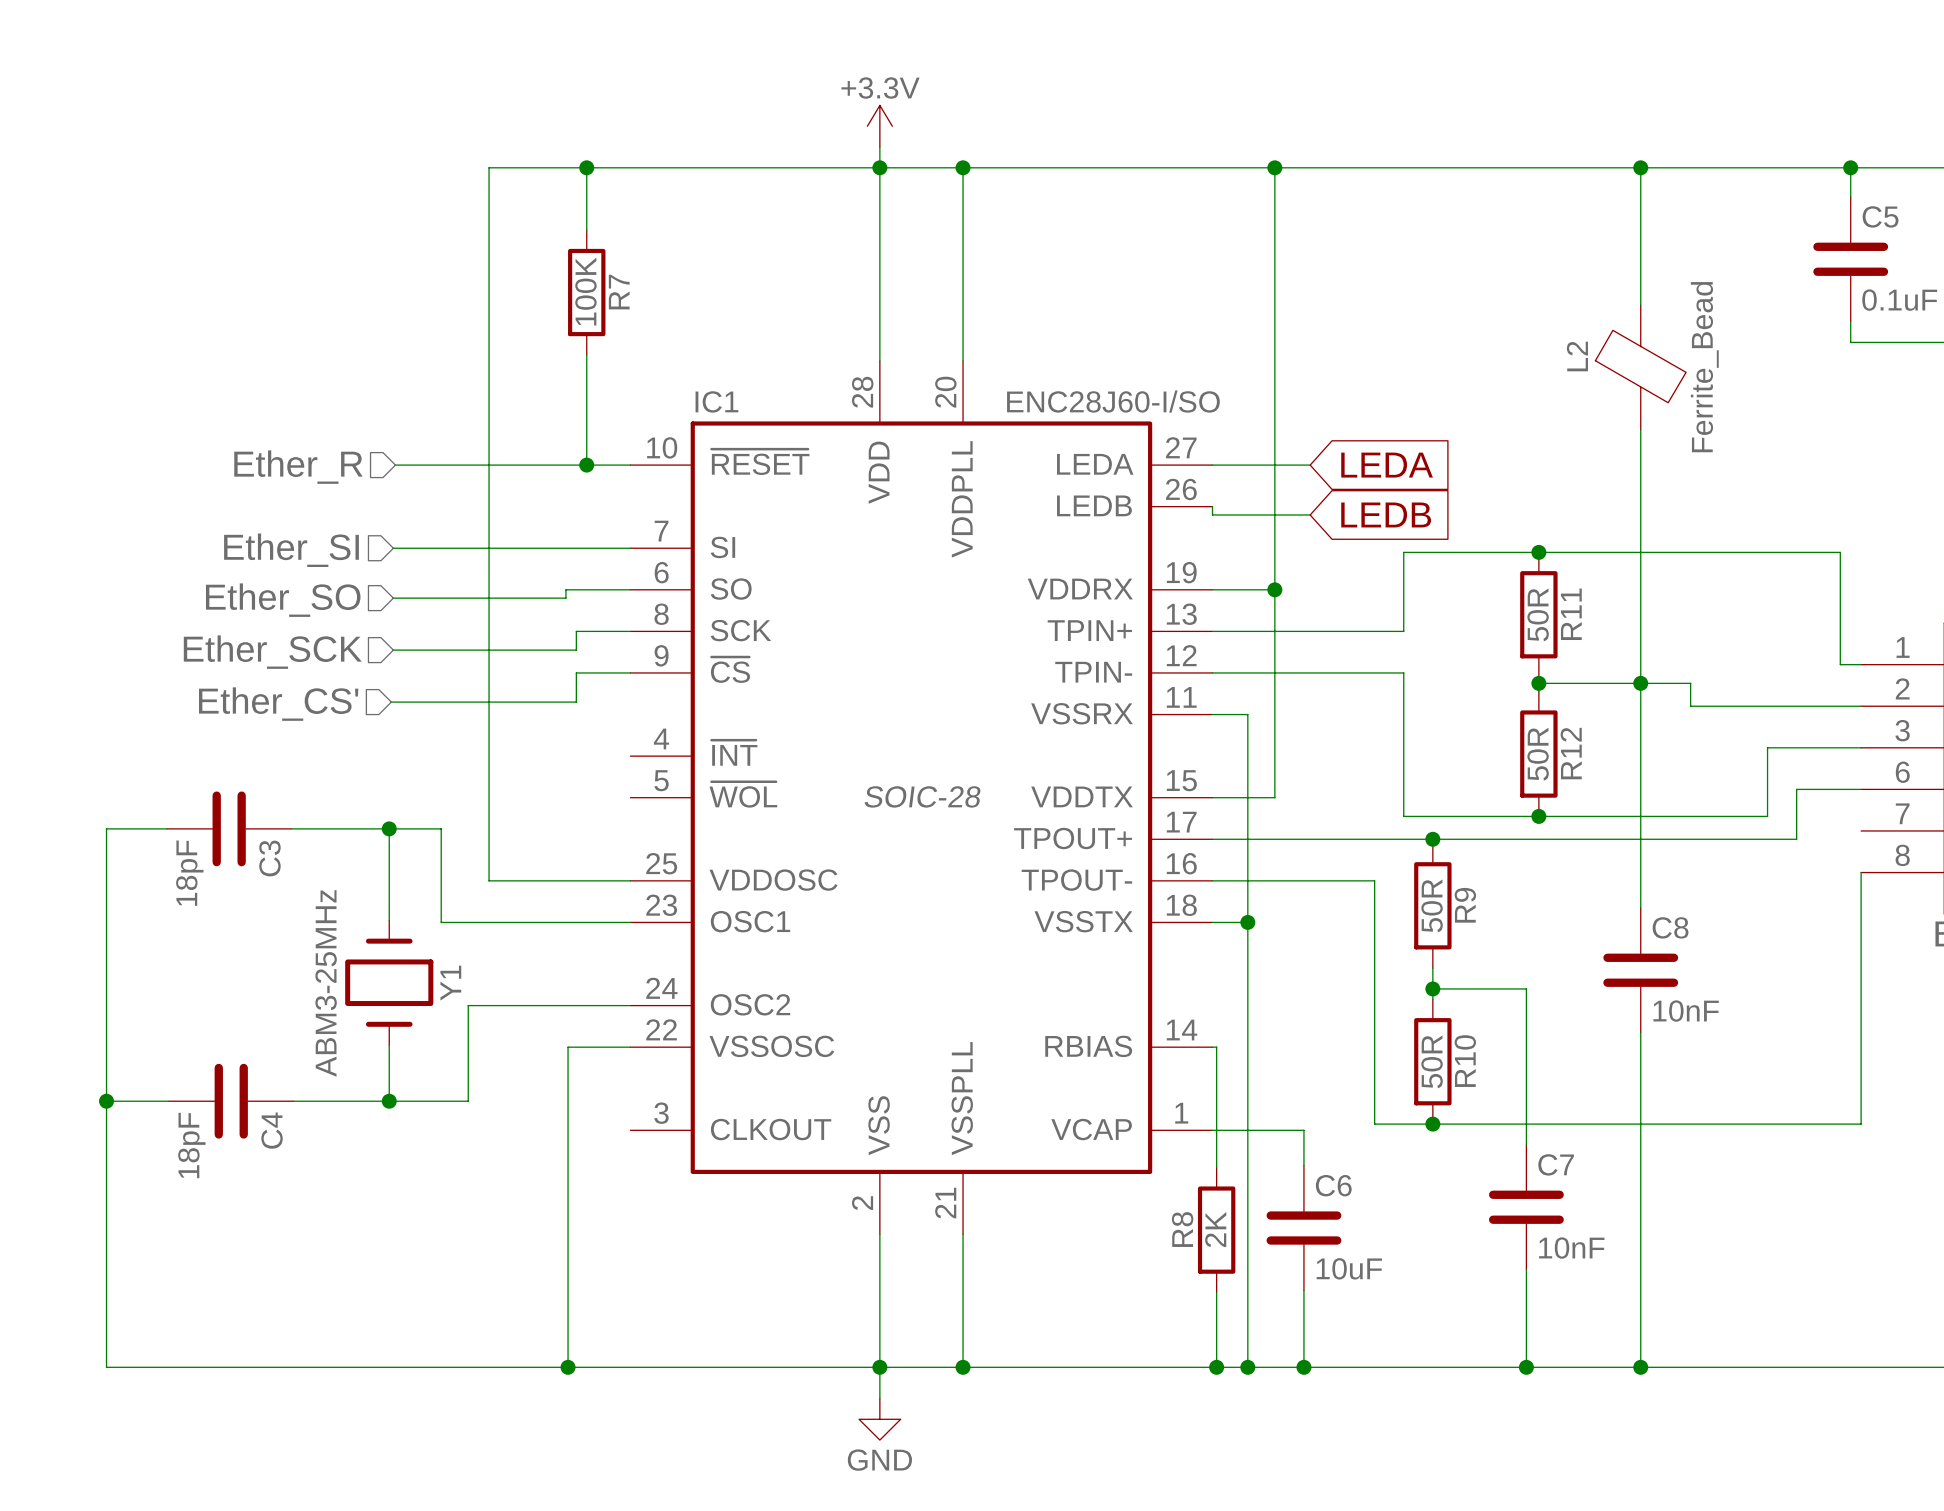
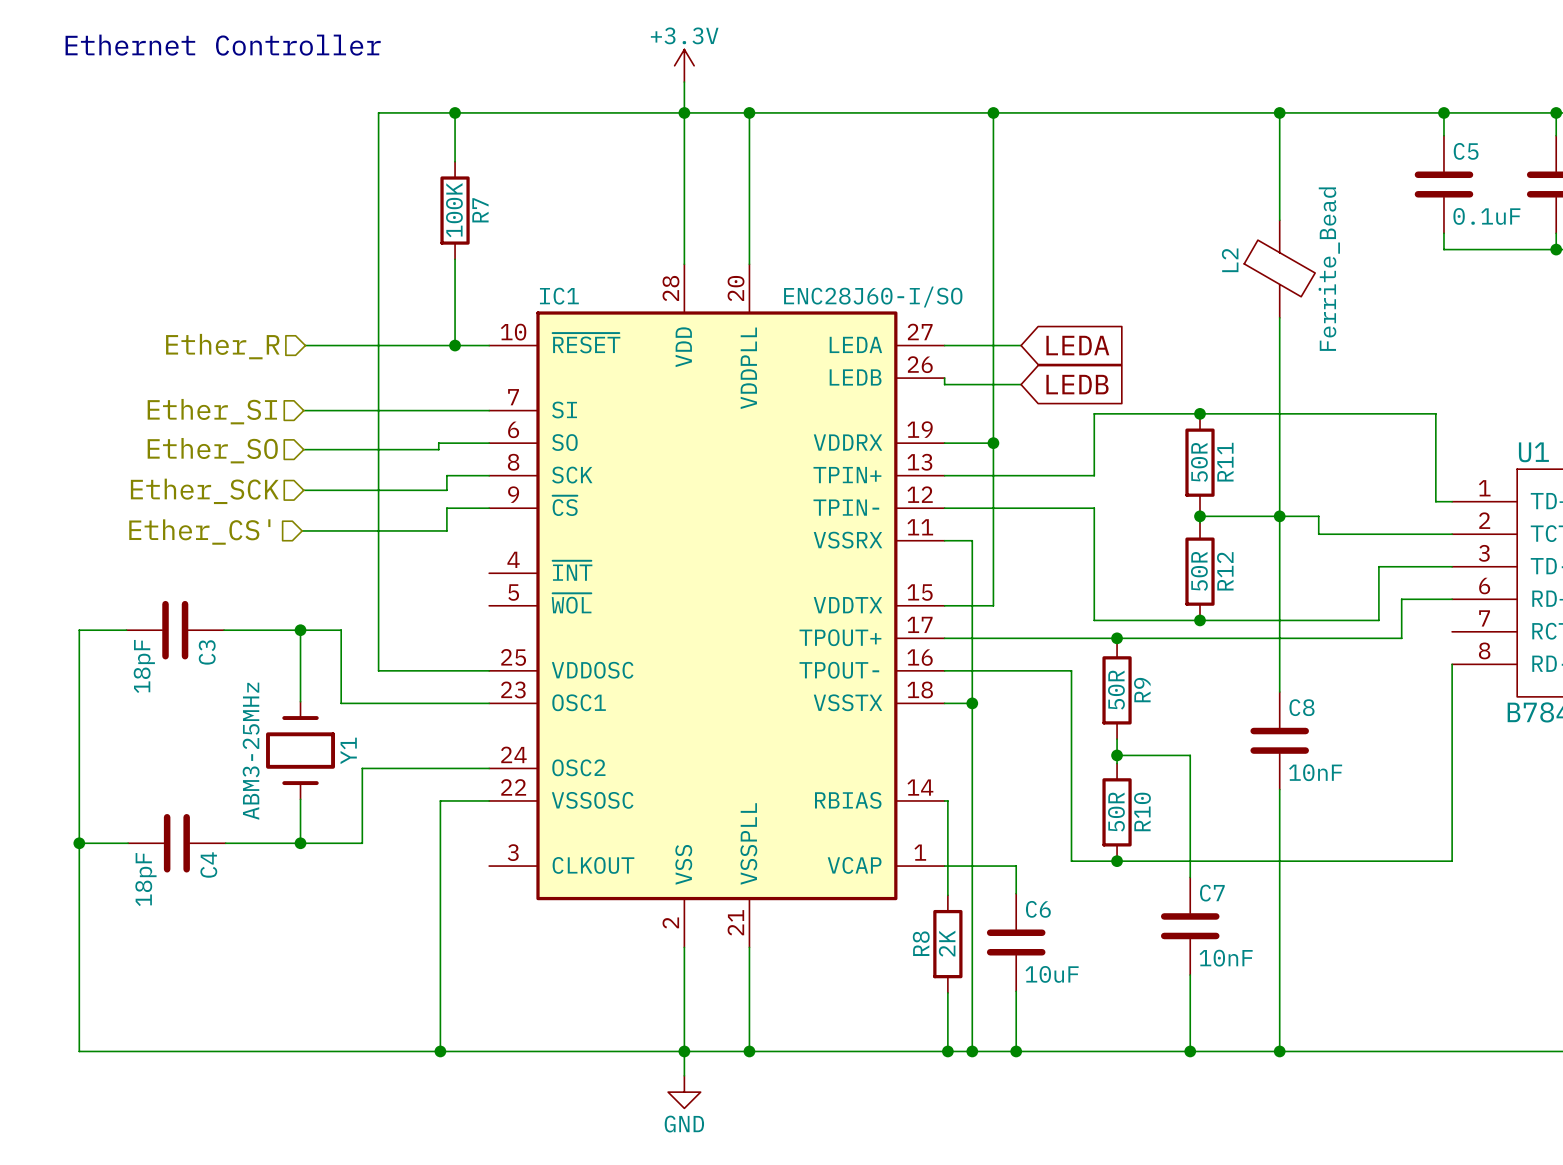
text: none -> Ethernet Controller (223, 45)
power symbol position: +3.3V (879, 126) -> +3.3V (684, 65)
IC1 text: SOIC-28 (922, 796) -> none

